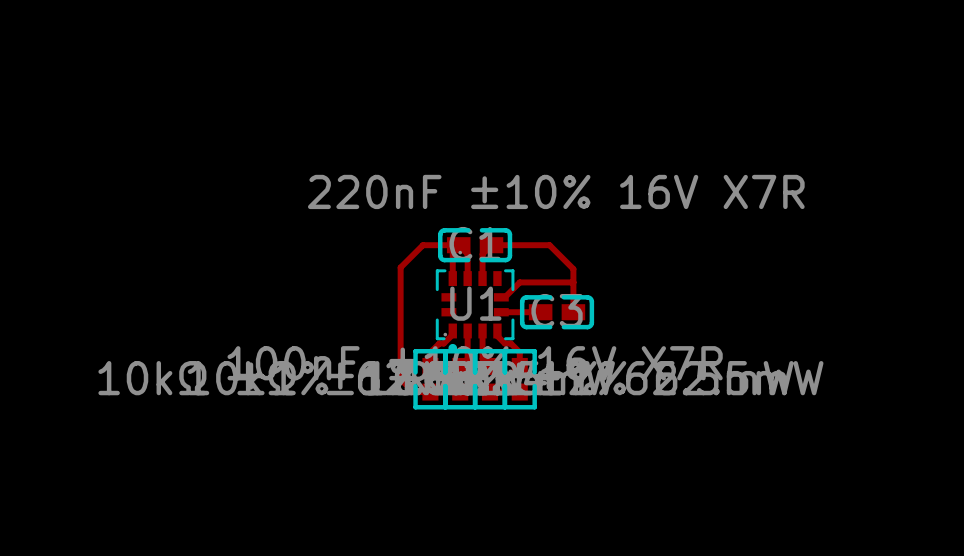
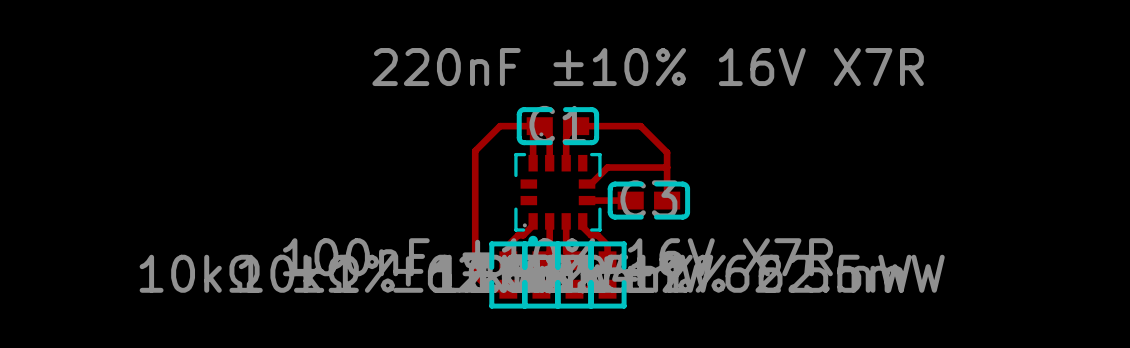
U1 name: U1 (475, 303) -> none

